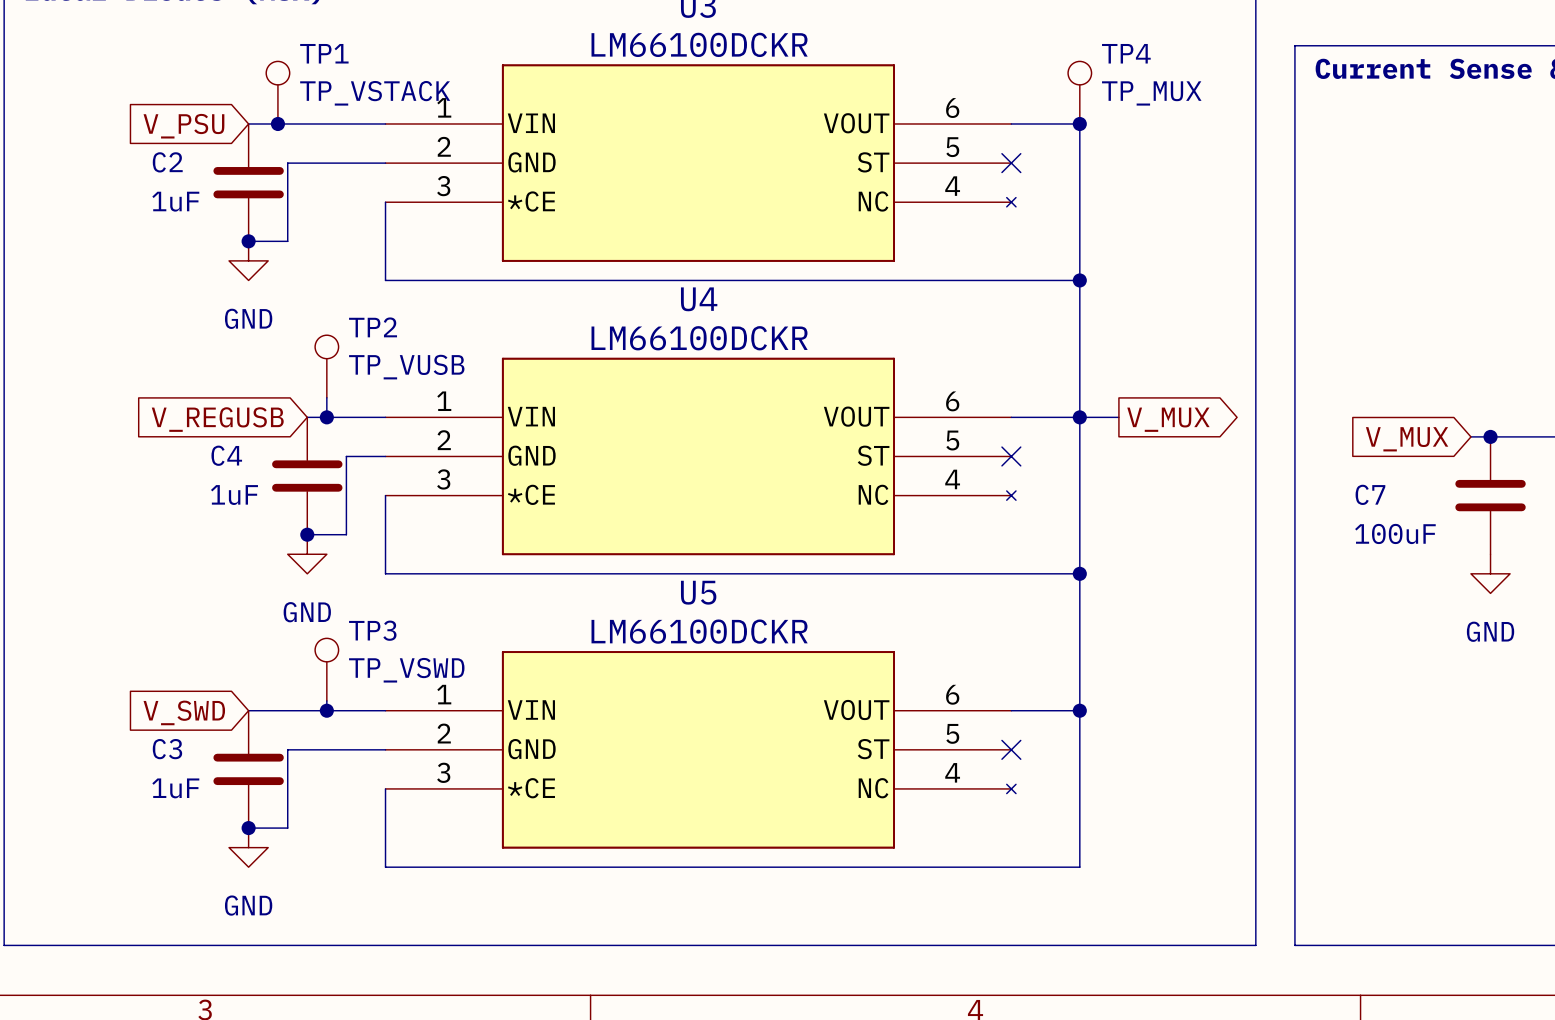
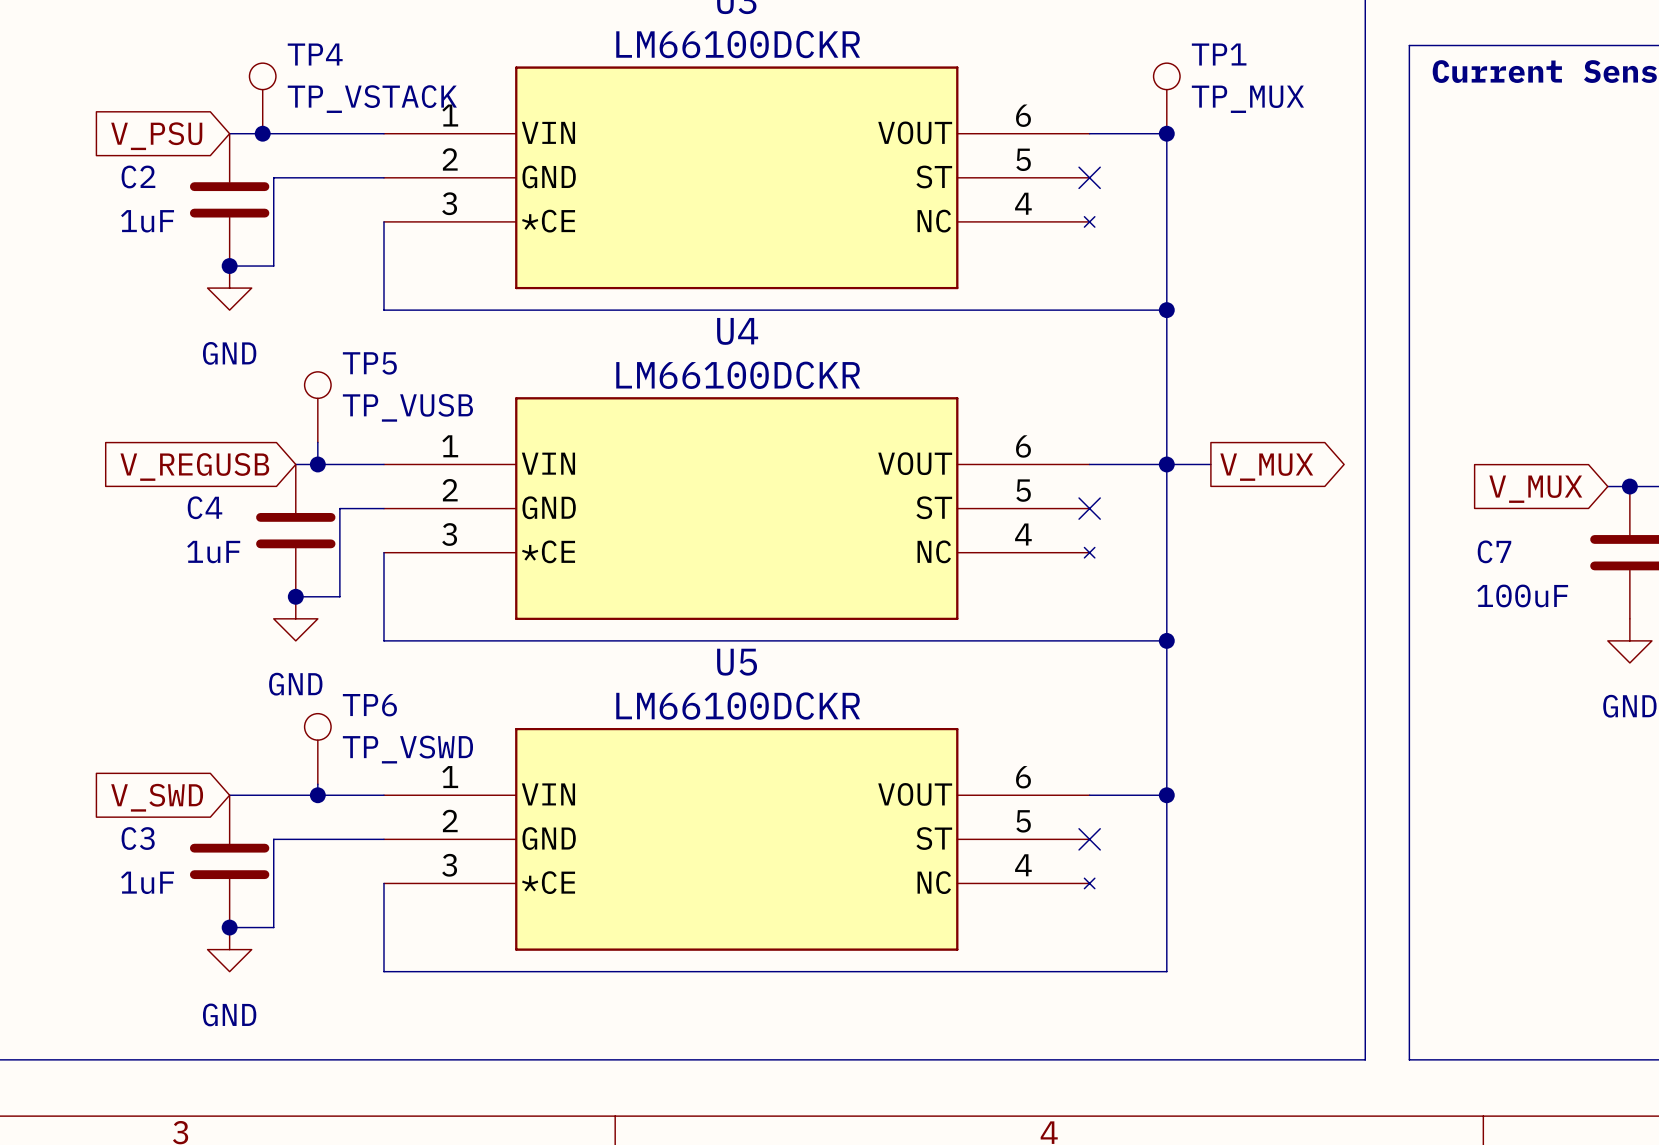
TP1 name: TP1 (324, 53) -> TP4 (315, 54)
TP4 name: TP4 (1126, 53) -> TP1 (1219, 54)
TP2 name: TP2 (373, 327) -> TP5 (369, 363)
TP3 name: TP3 (372, 630) -> TP6 (369, 705)

